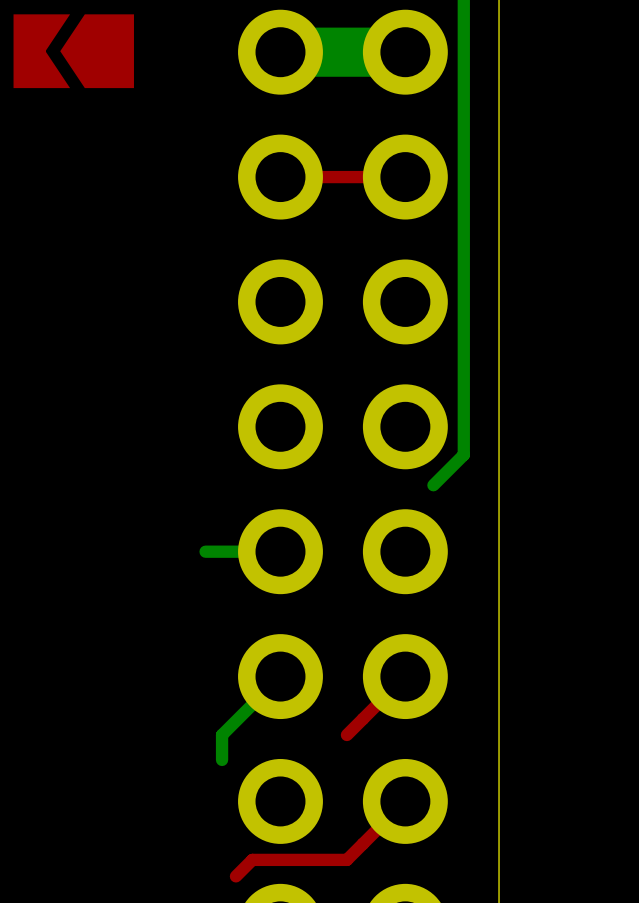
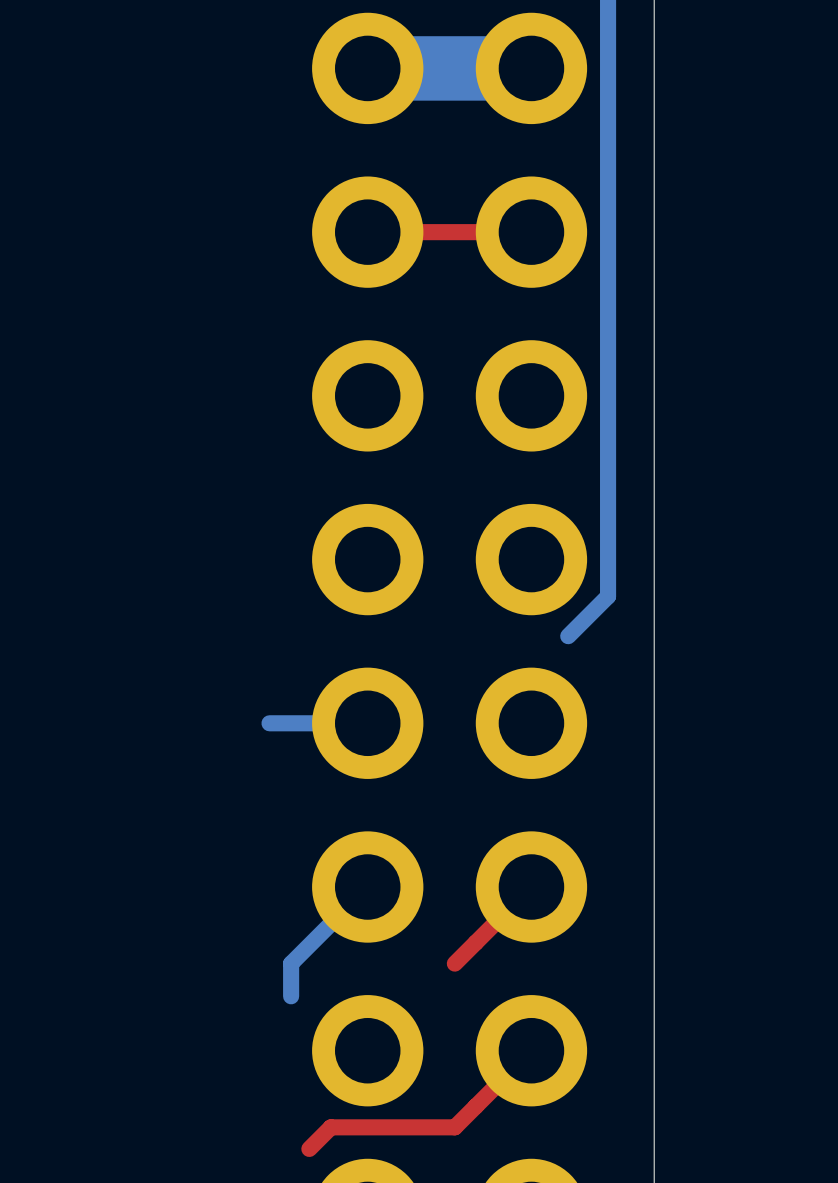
part: (73, 51) -> none

